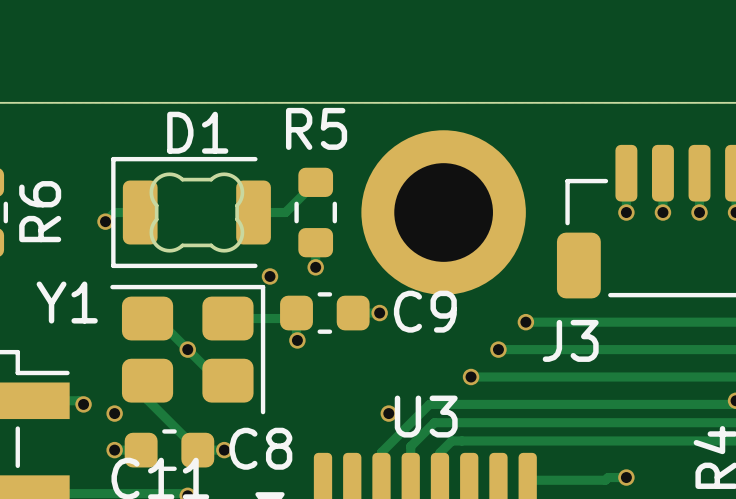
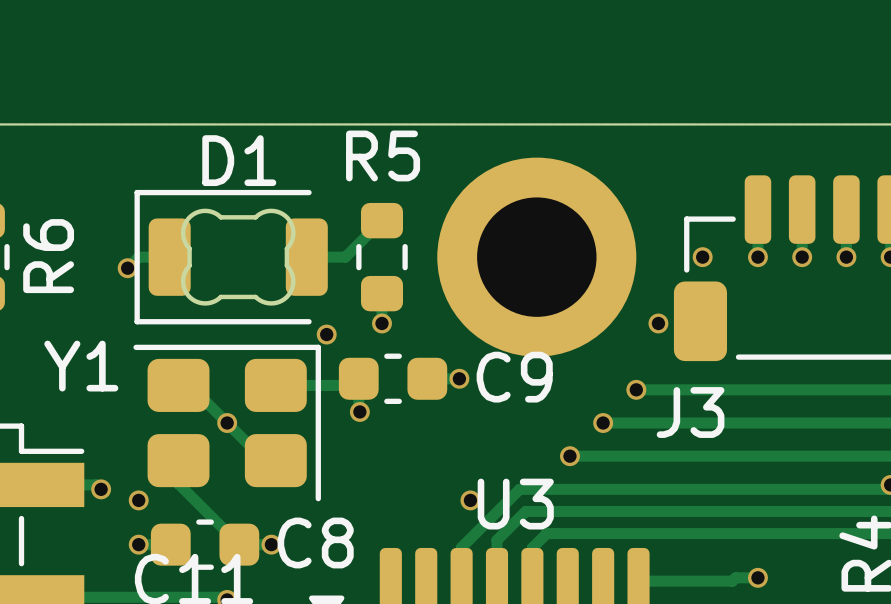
via: none -> (702, 257)
via: none -> (658, 323)

